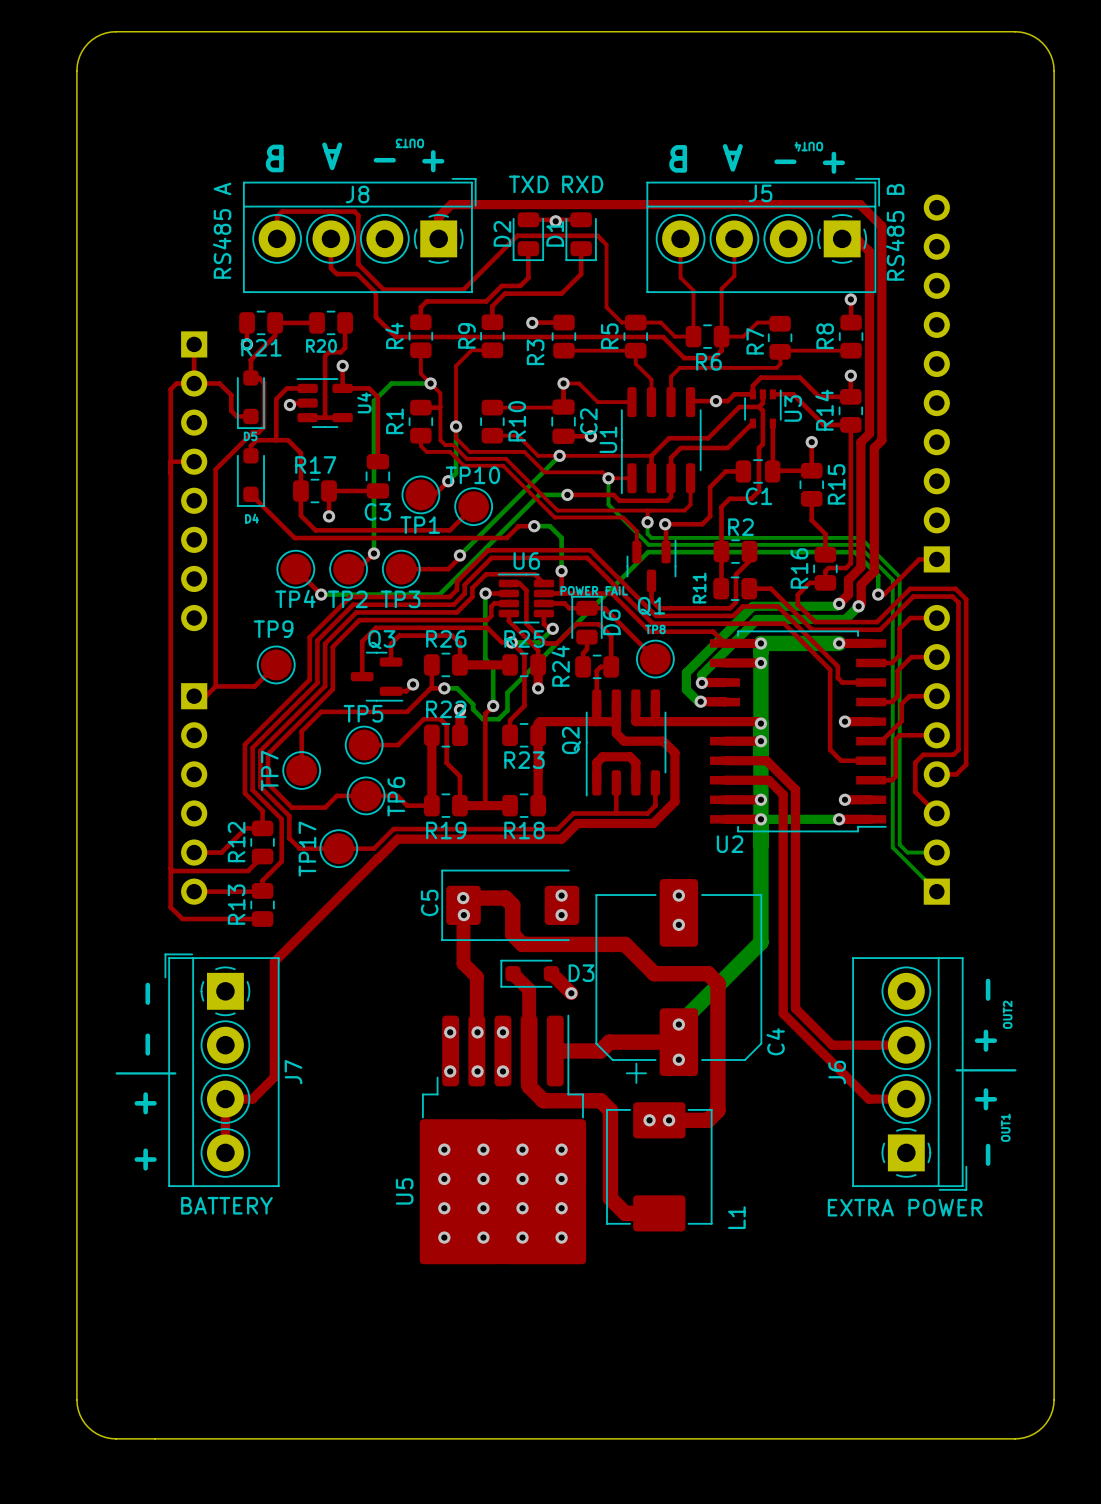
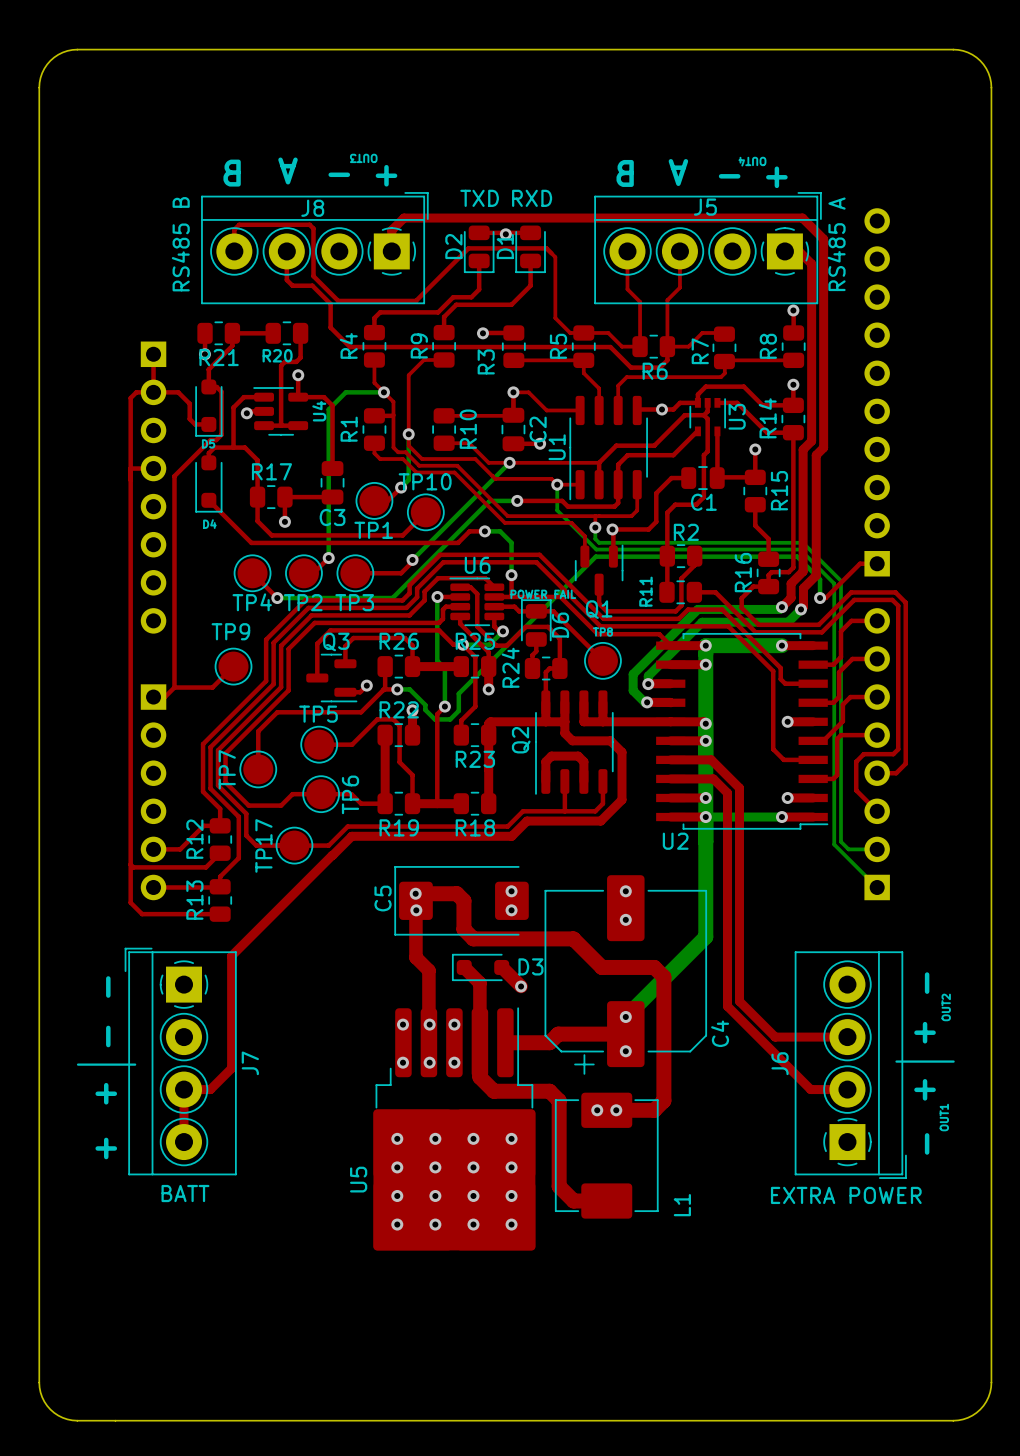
J8 value: RS485 A (222, 230) -> RS485 B (180, 244)
J5 value: RS485 B (895, 232) -> RS485 A (836, 244)
J7 value: BATTERY (226, 1205) -> BATT (185, 1193)

